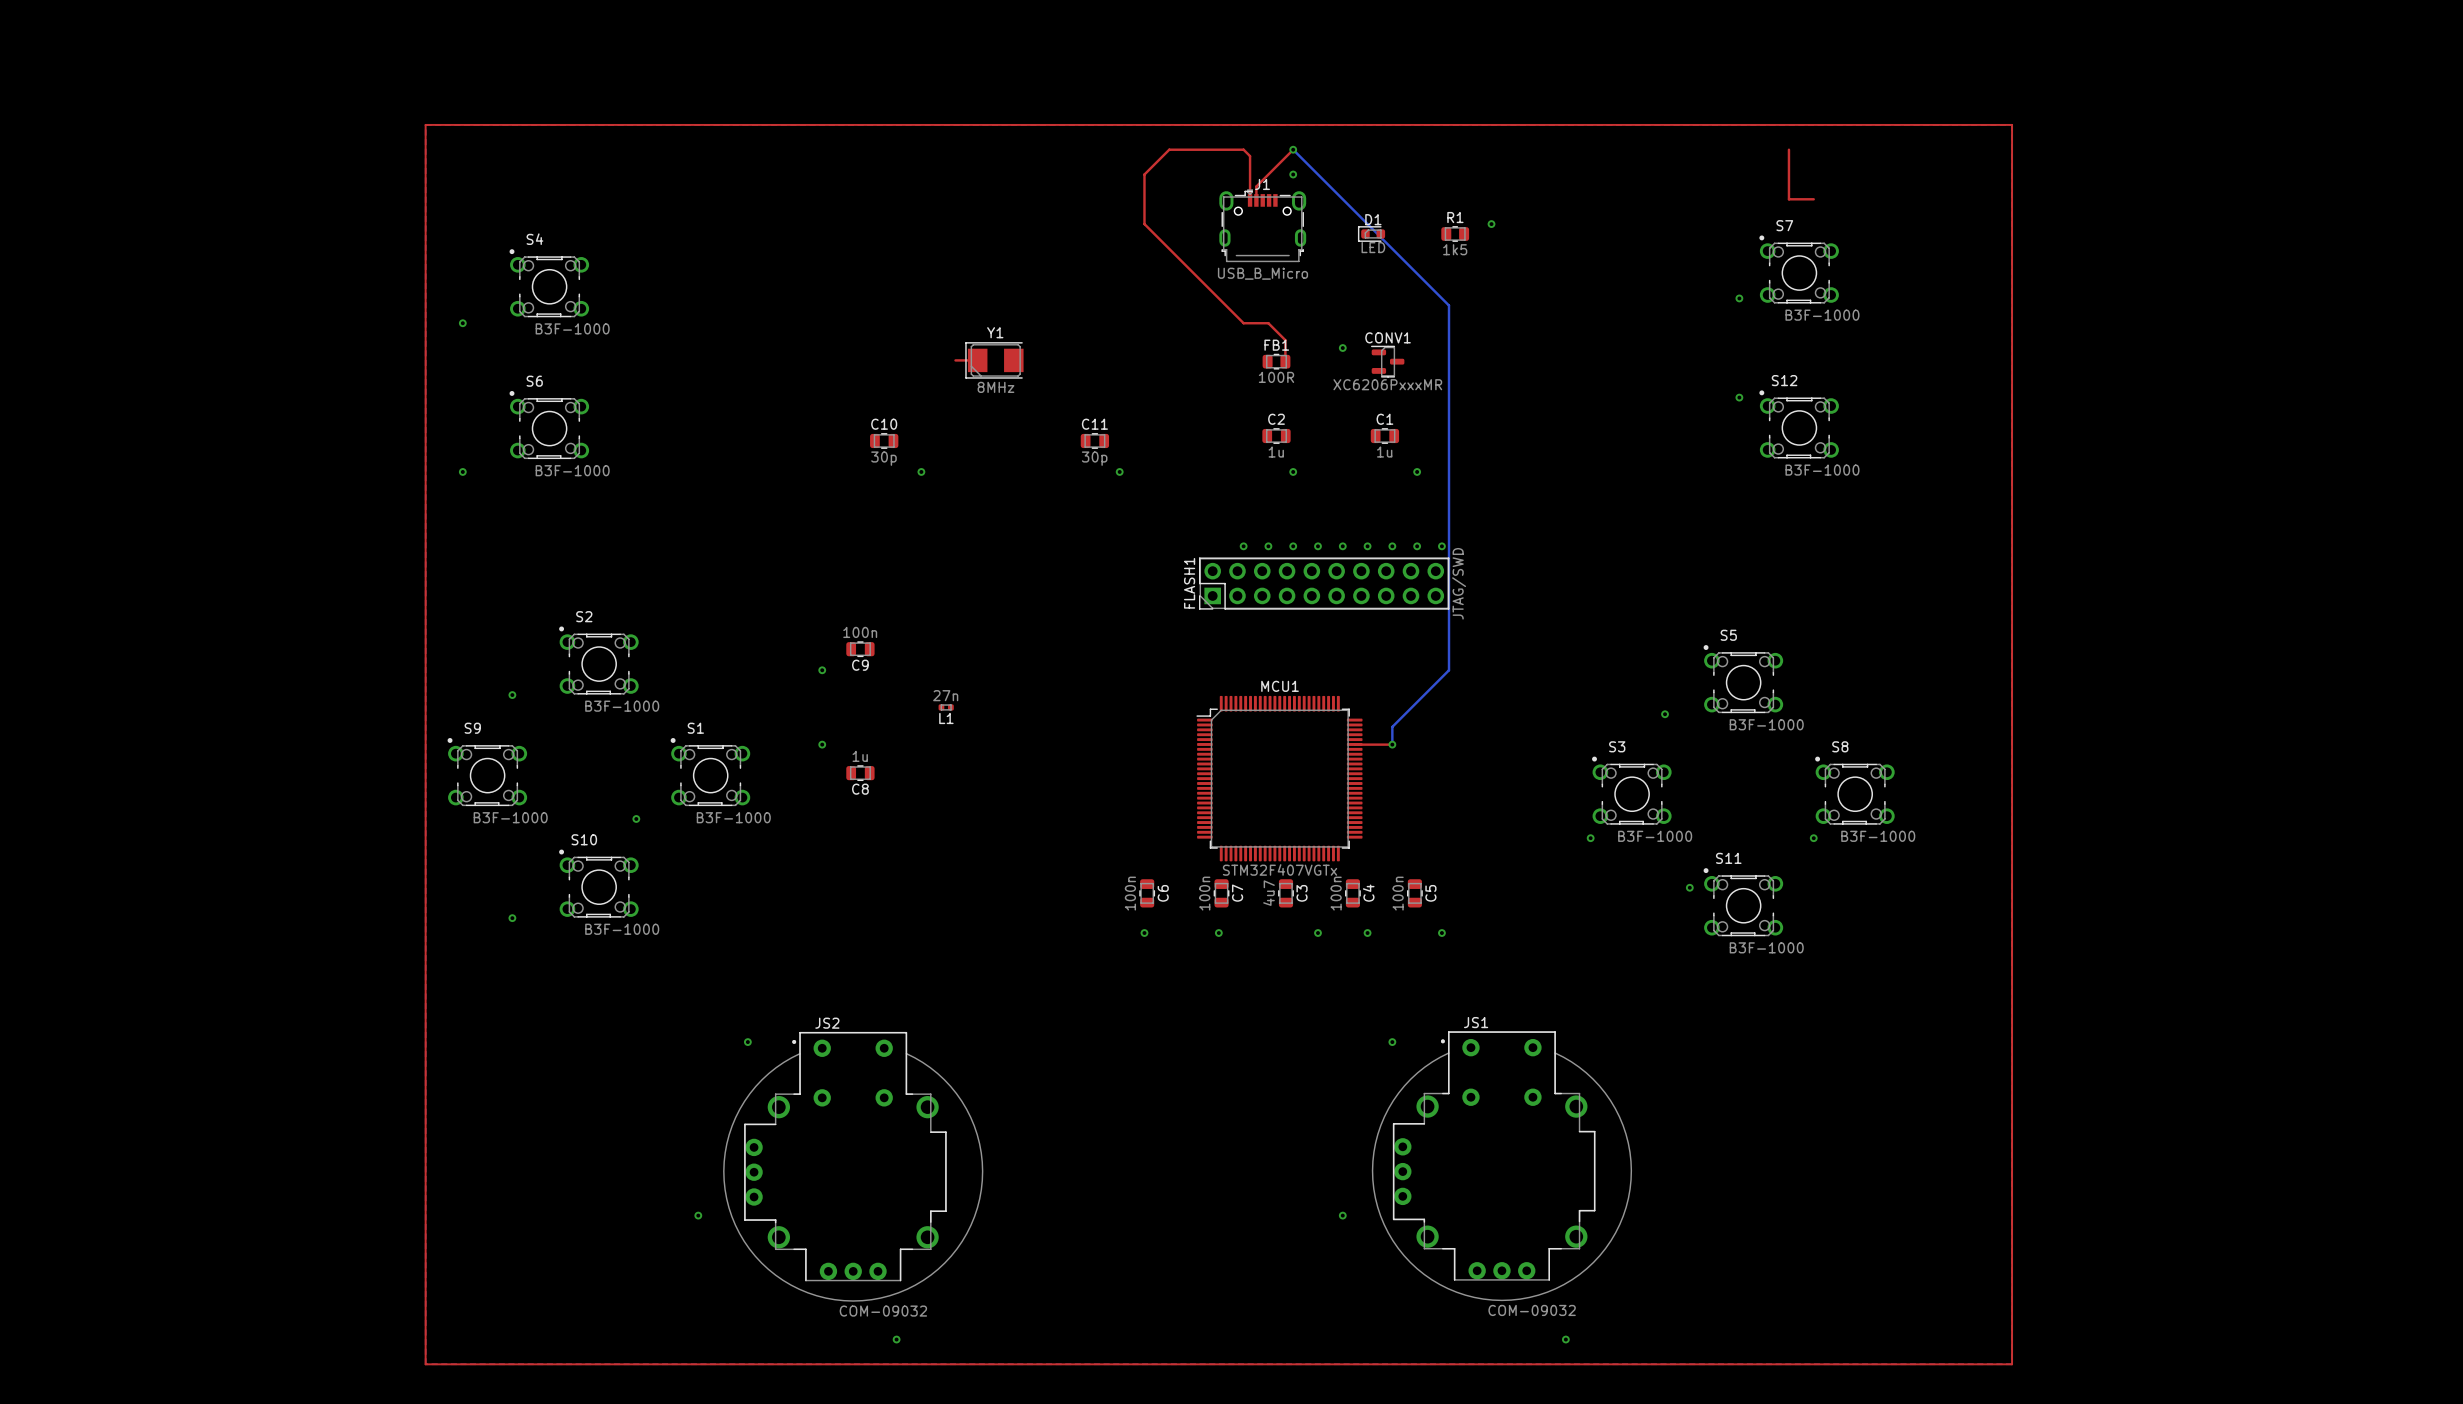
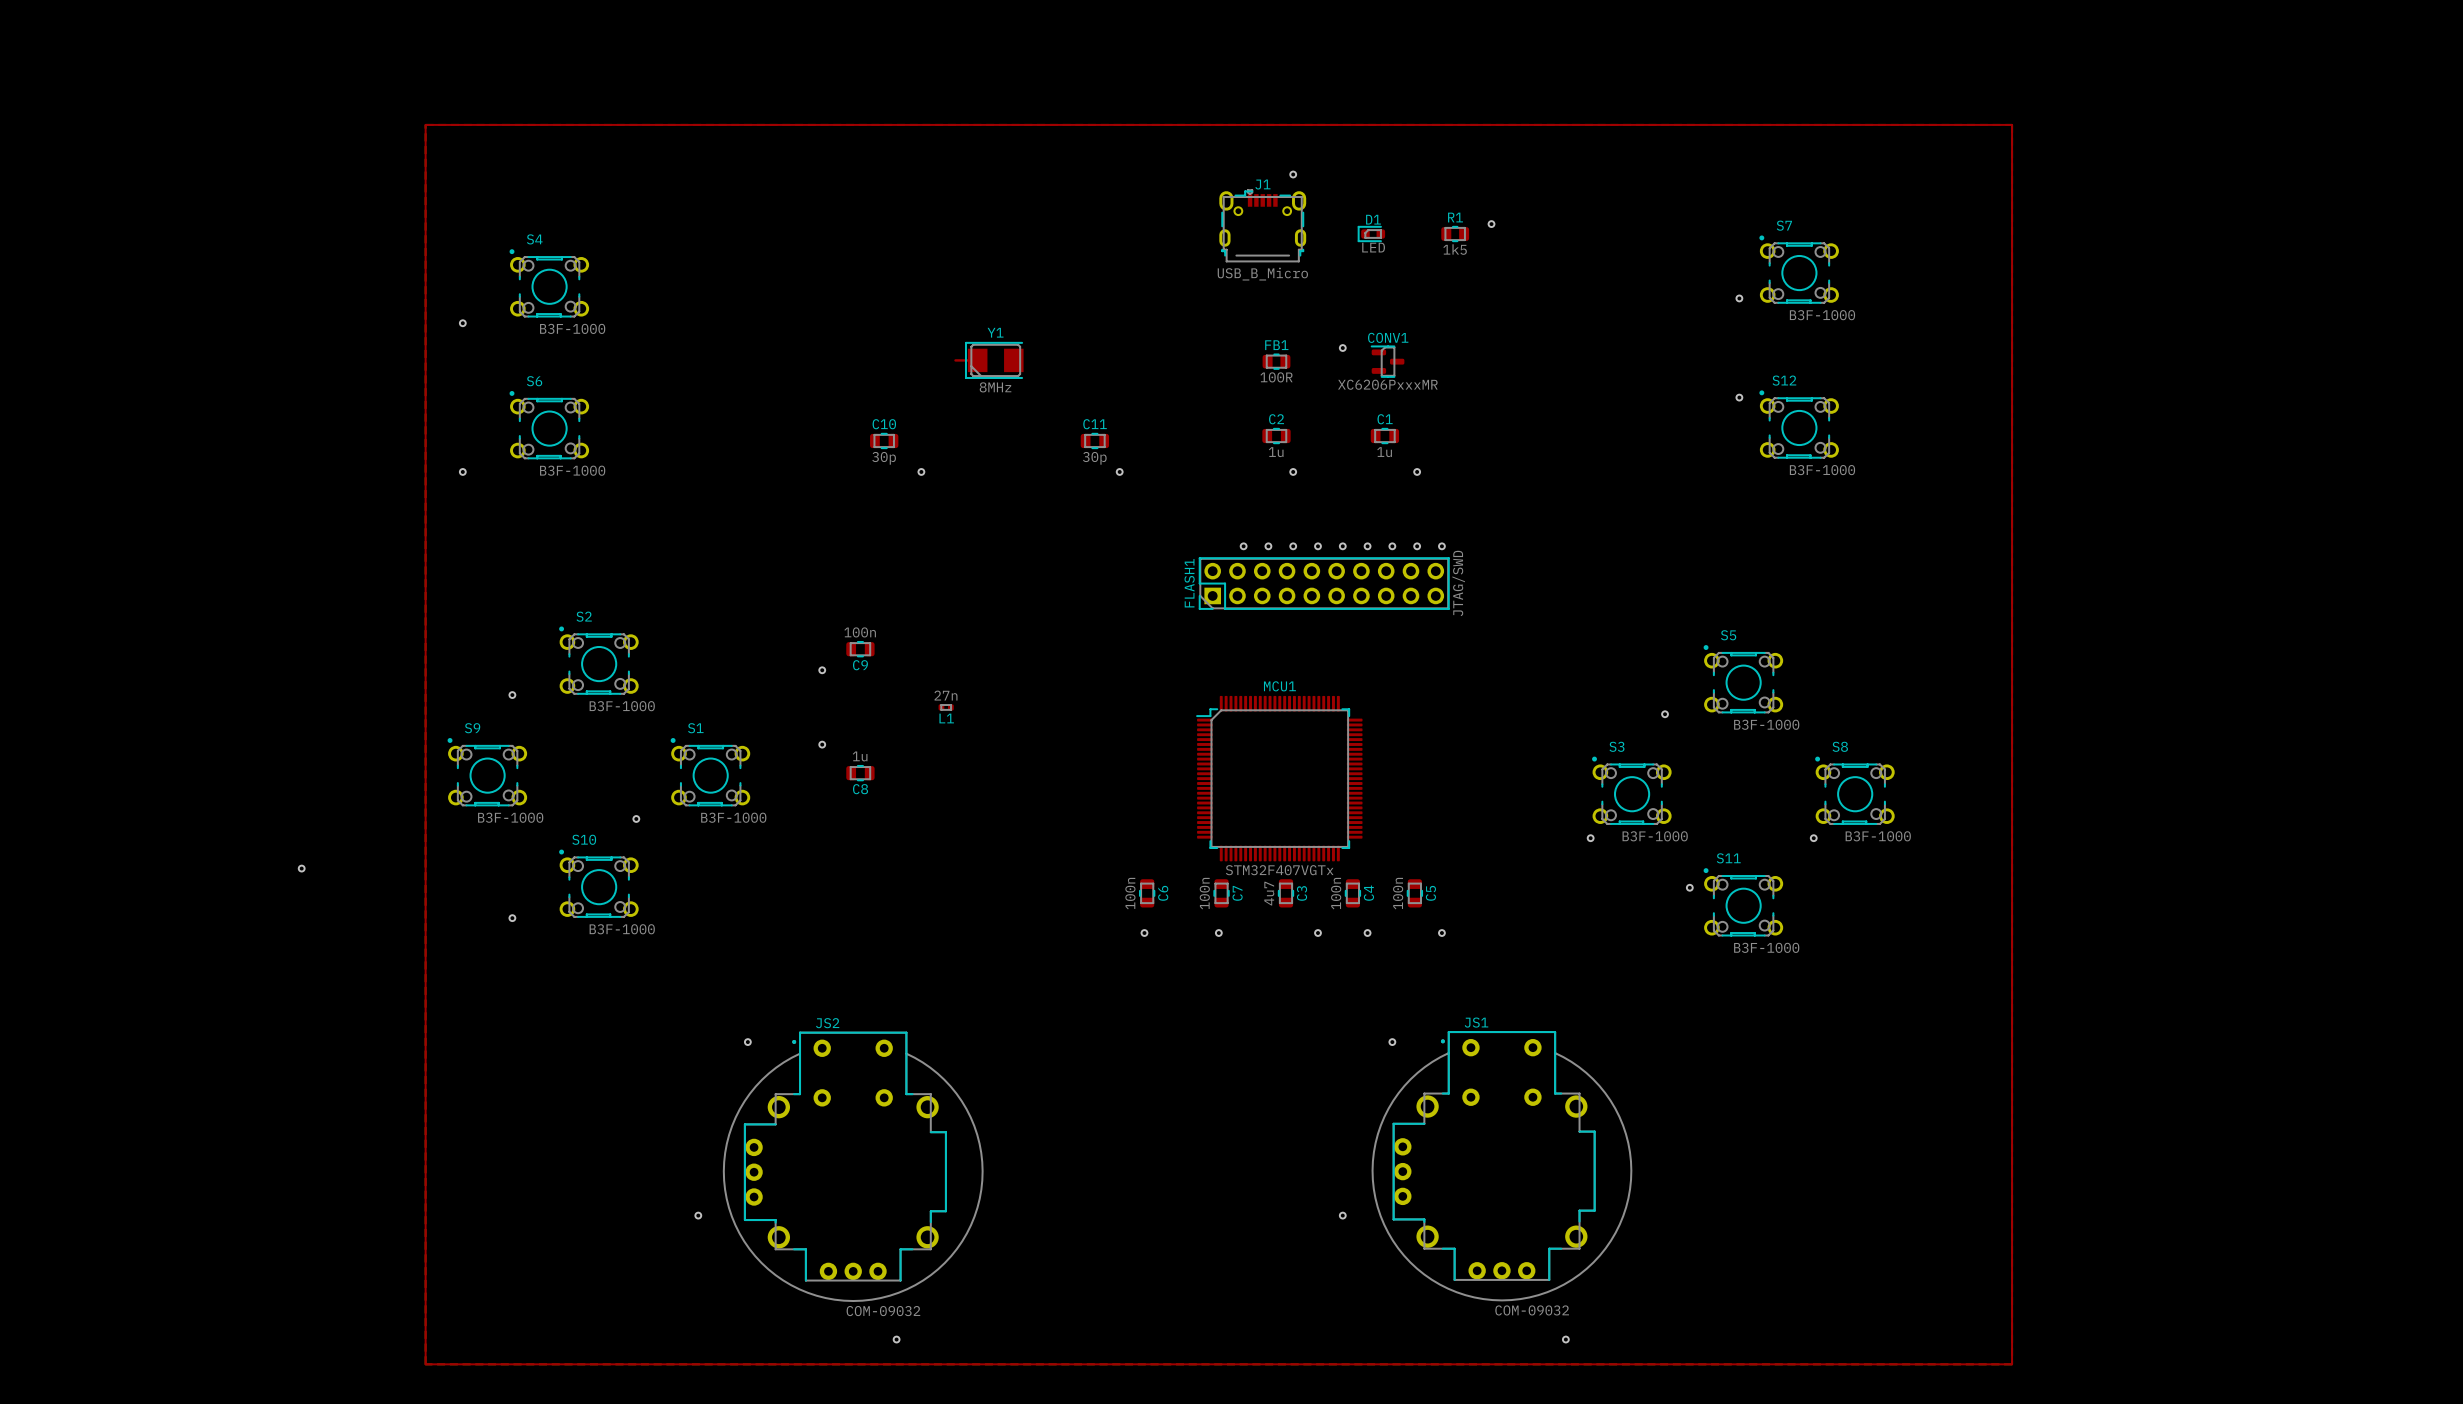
top track: (1293, 149) (1256, 186) (1256, 200) -> none
bottom track: (1293, 149) (1449, 305) (1449, 670) (1392, 726) (1392, 744) -> none
via: (1293, 149) -> none
top track: (1788, 149) (1788, 199) (1813, 199) -> none
top track: (1250, 200) (1250, 156) (1243, 149) (1169, 149) (1144, 174) (1144, 224) (1243, 323) (1268, 323) (1285, 340) (1285, 361) -> none
top track: (1354, 744) (1392, 744) -> none
via: (1392, 744) -> none
via: none -> (301, 868)

